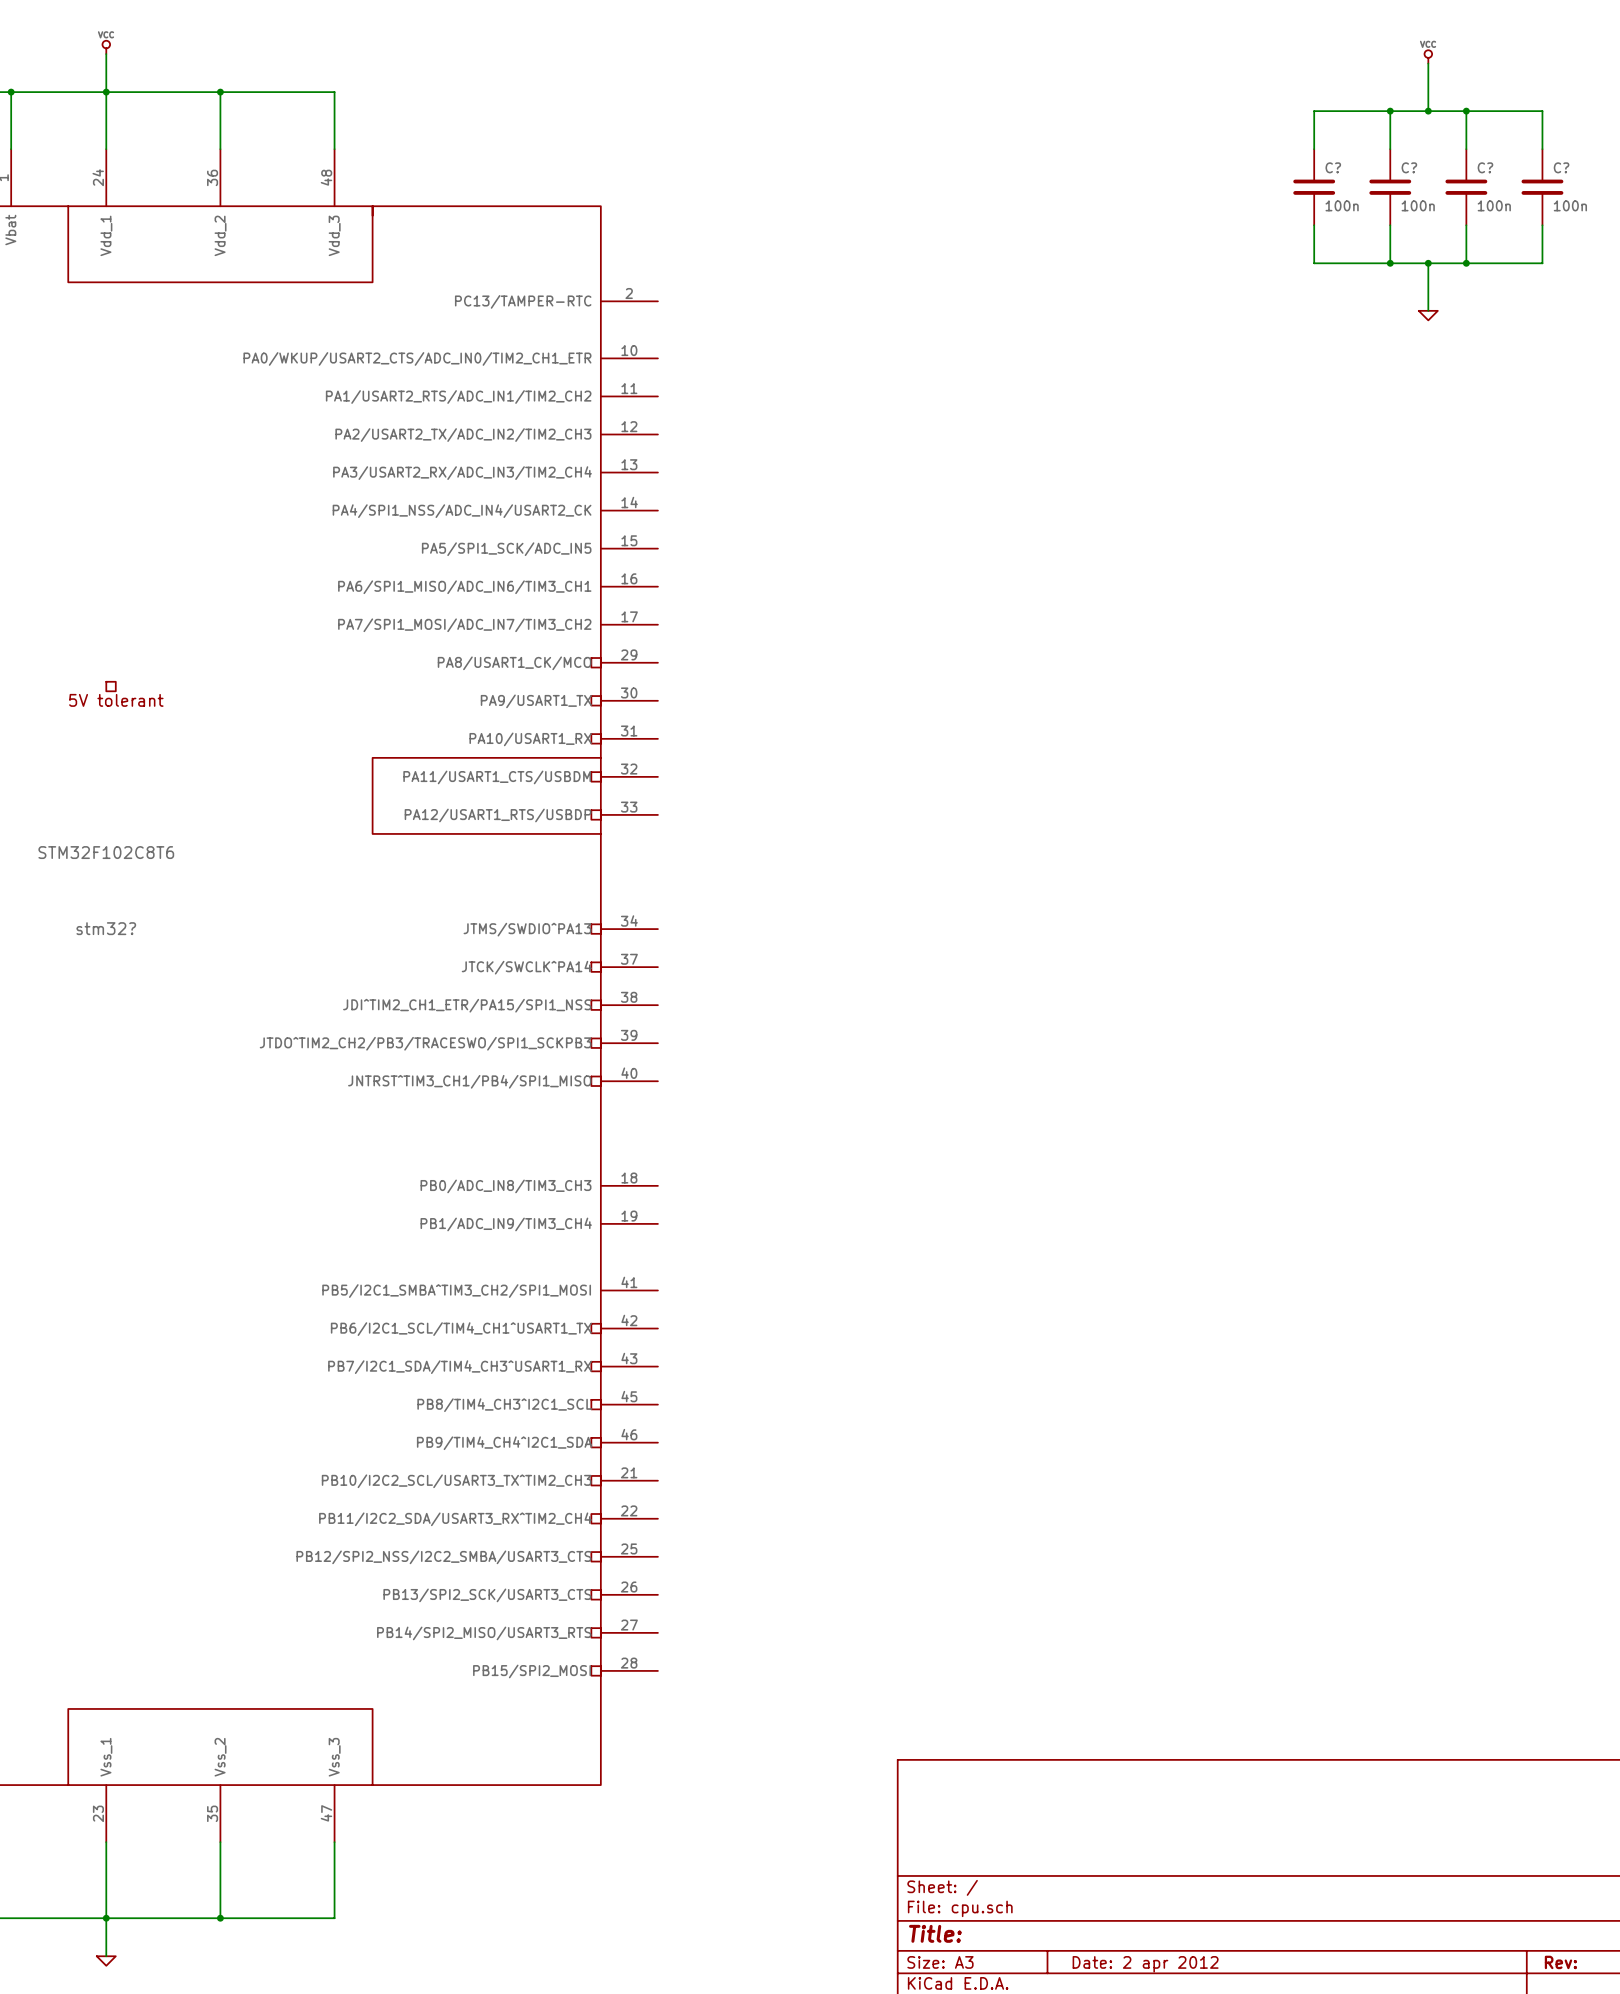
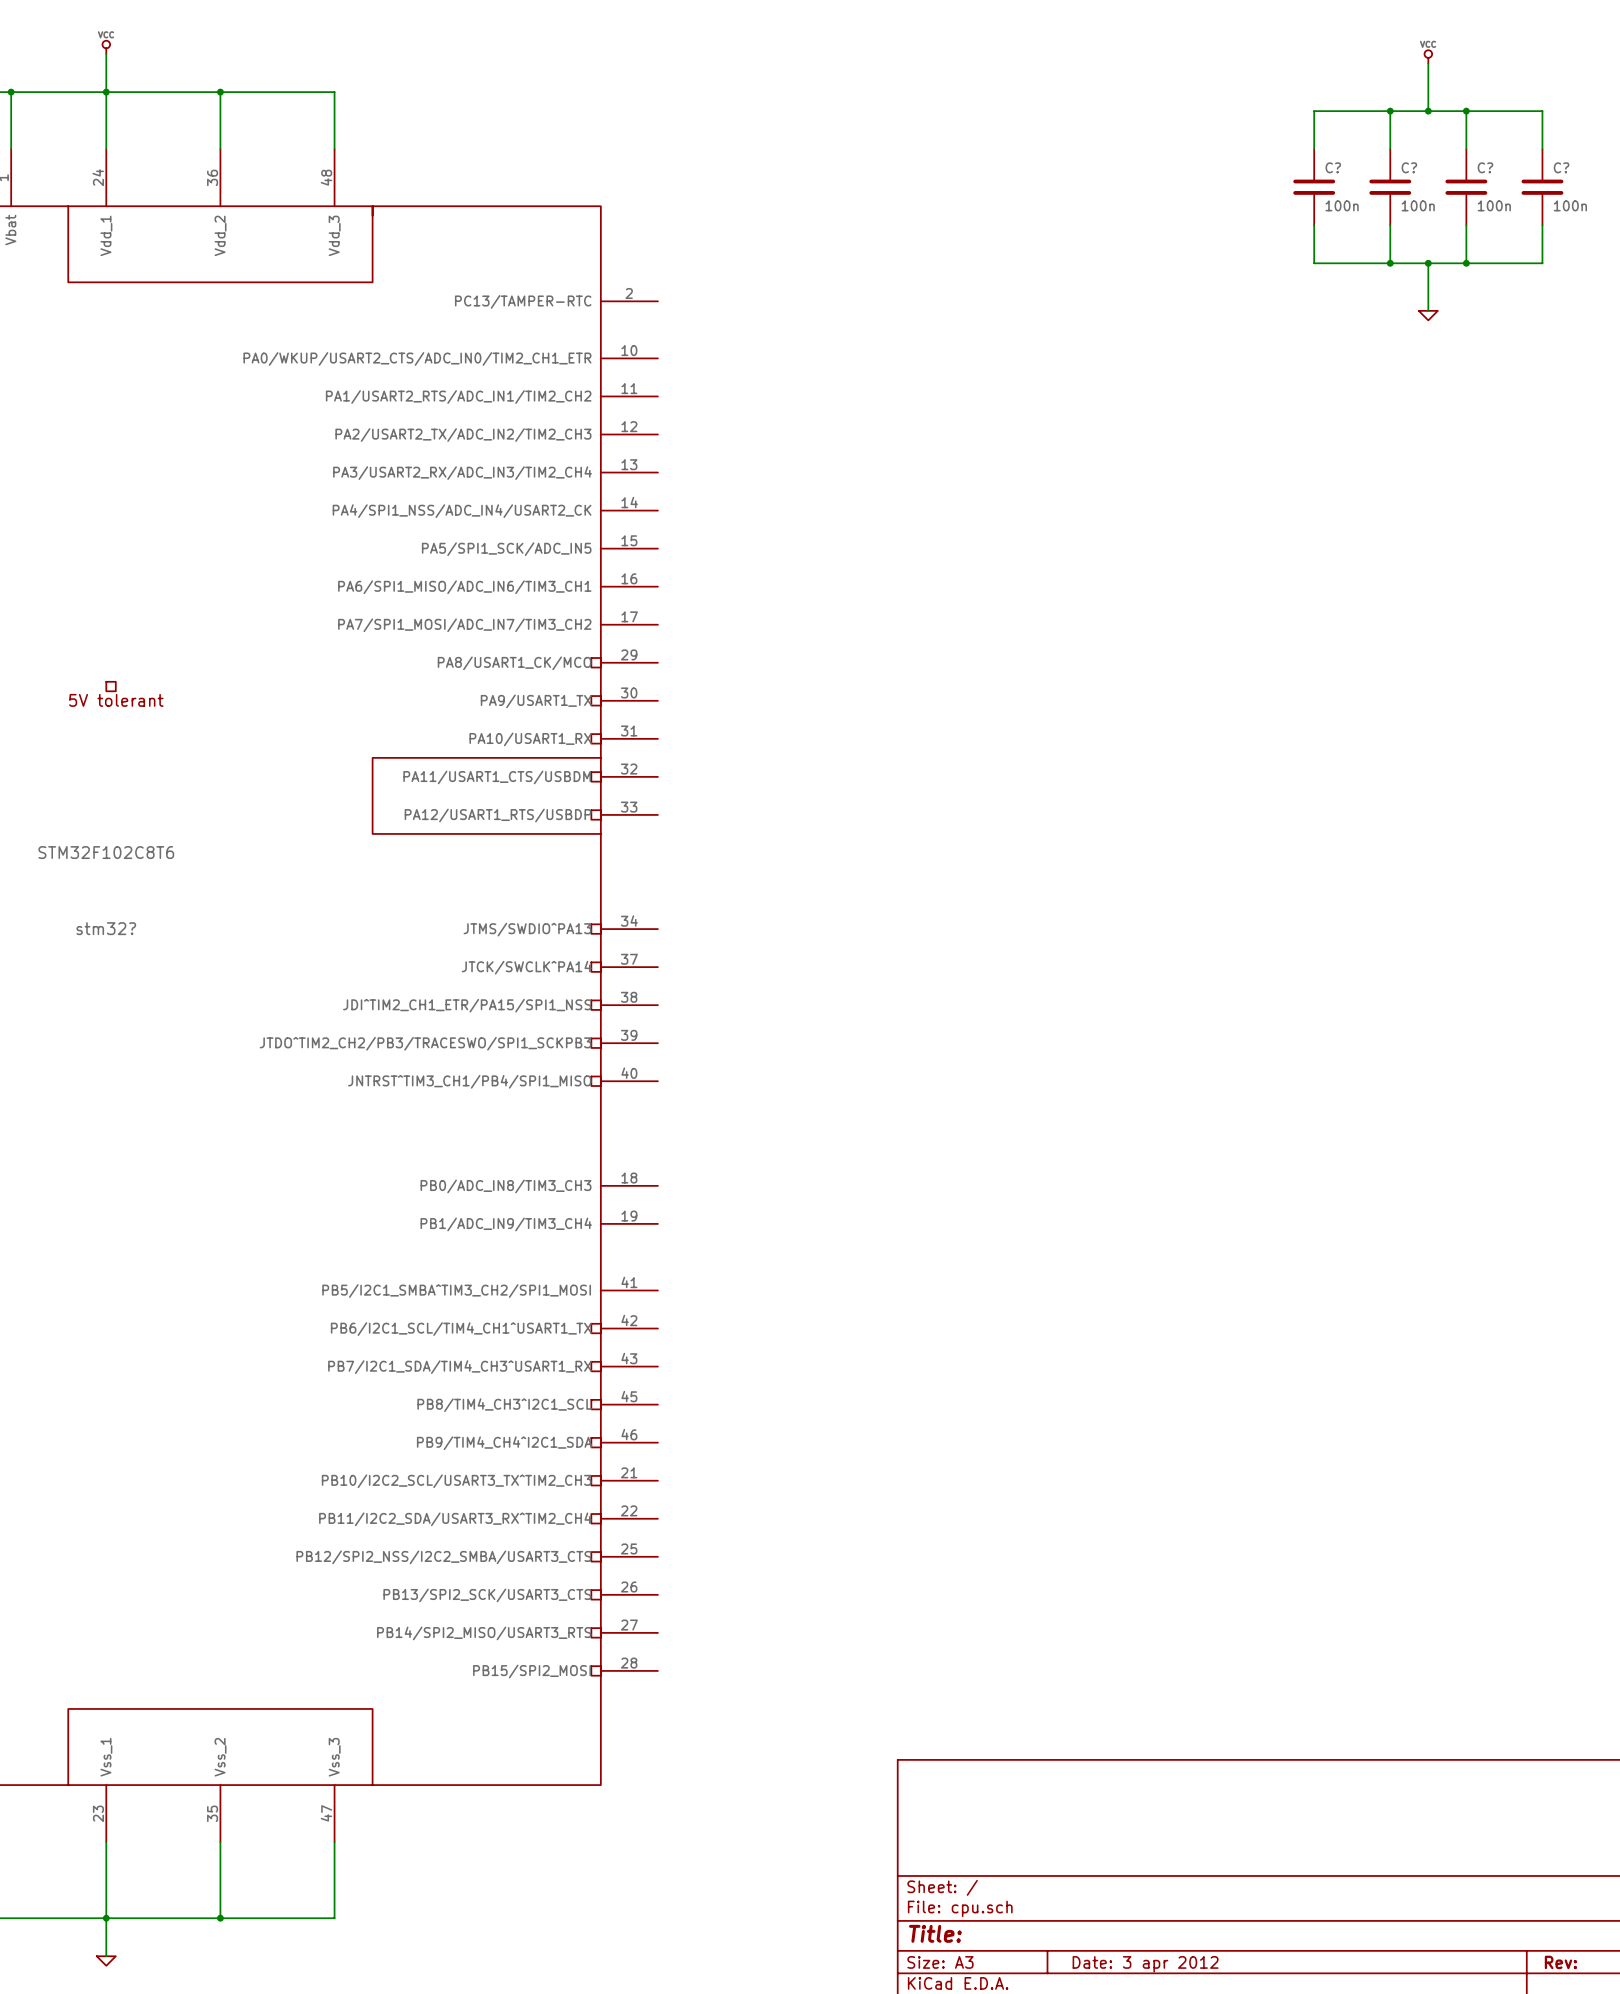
title block: Date: 2 apr 2012 (1145, 1964) -> Date: 3 apr 2012 (1145, 1964)

